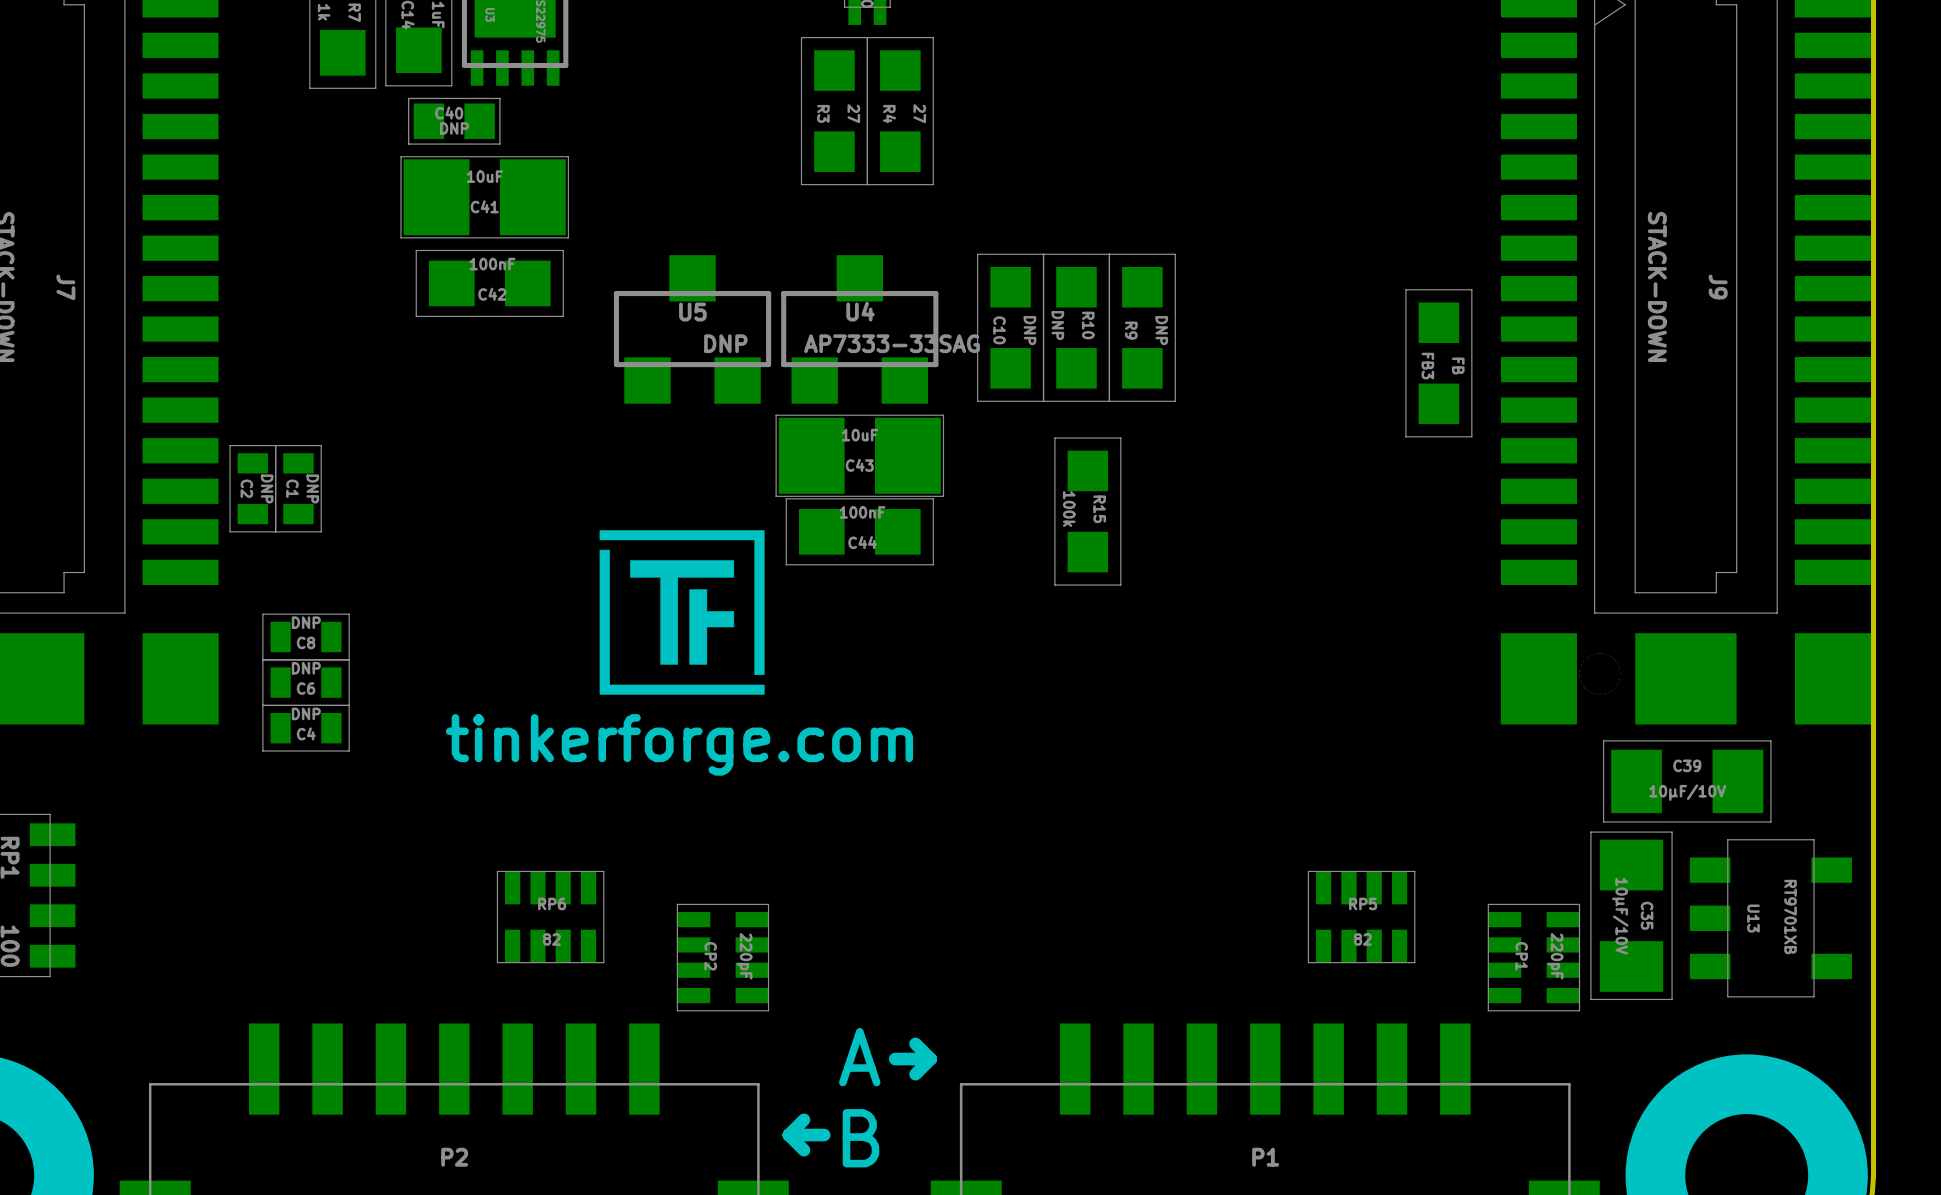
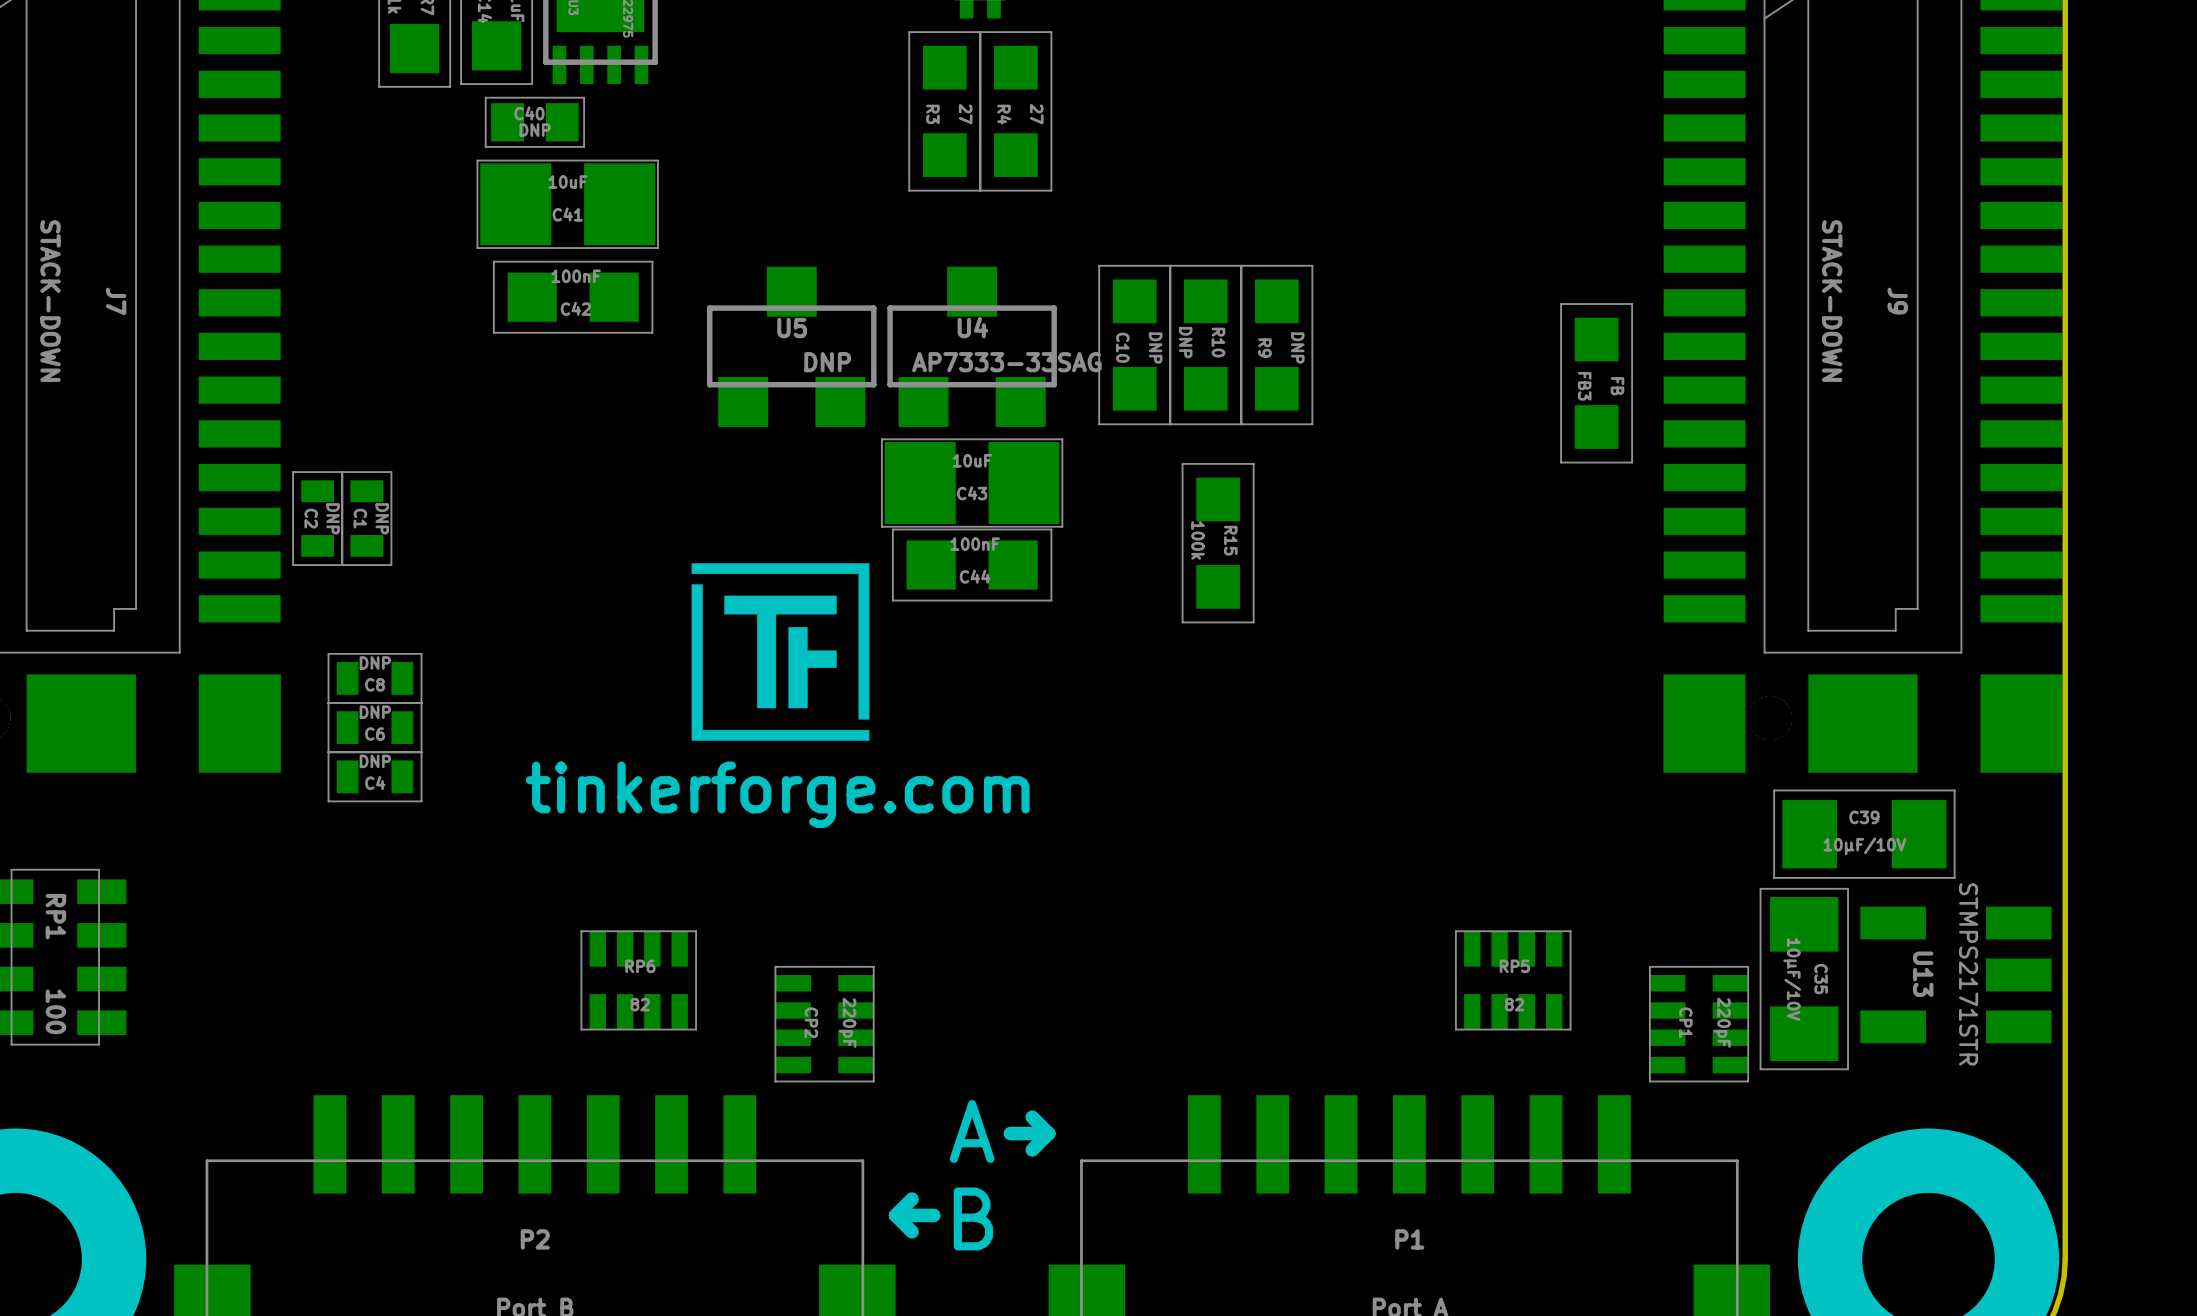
U13 footprint: [1689, 839, 1852, 997] -> [1860, 906, 2052, 1044]
U13 value: RT9701XB (1790, 917) -> STMPS2171STR (1968, 974)

